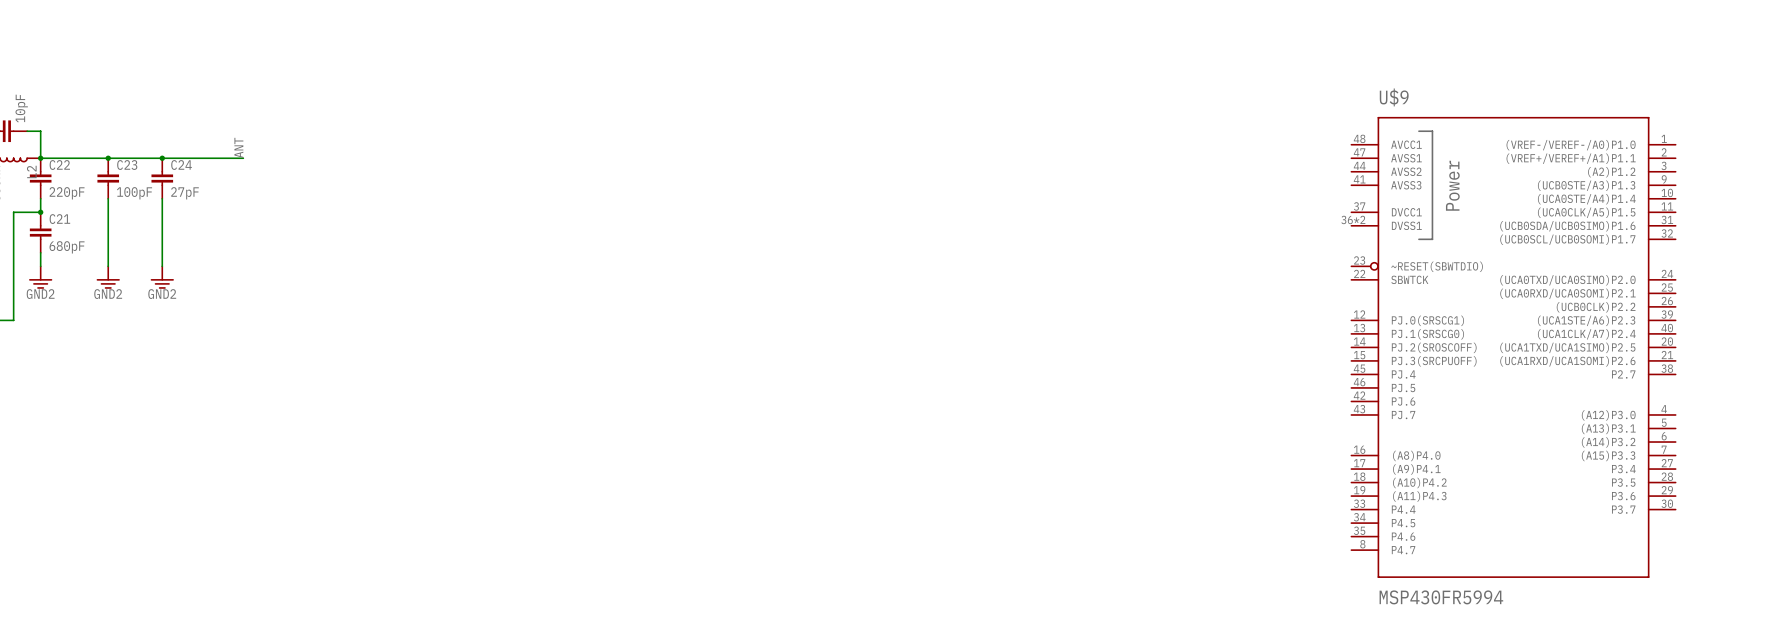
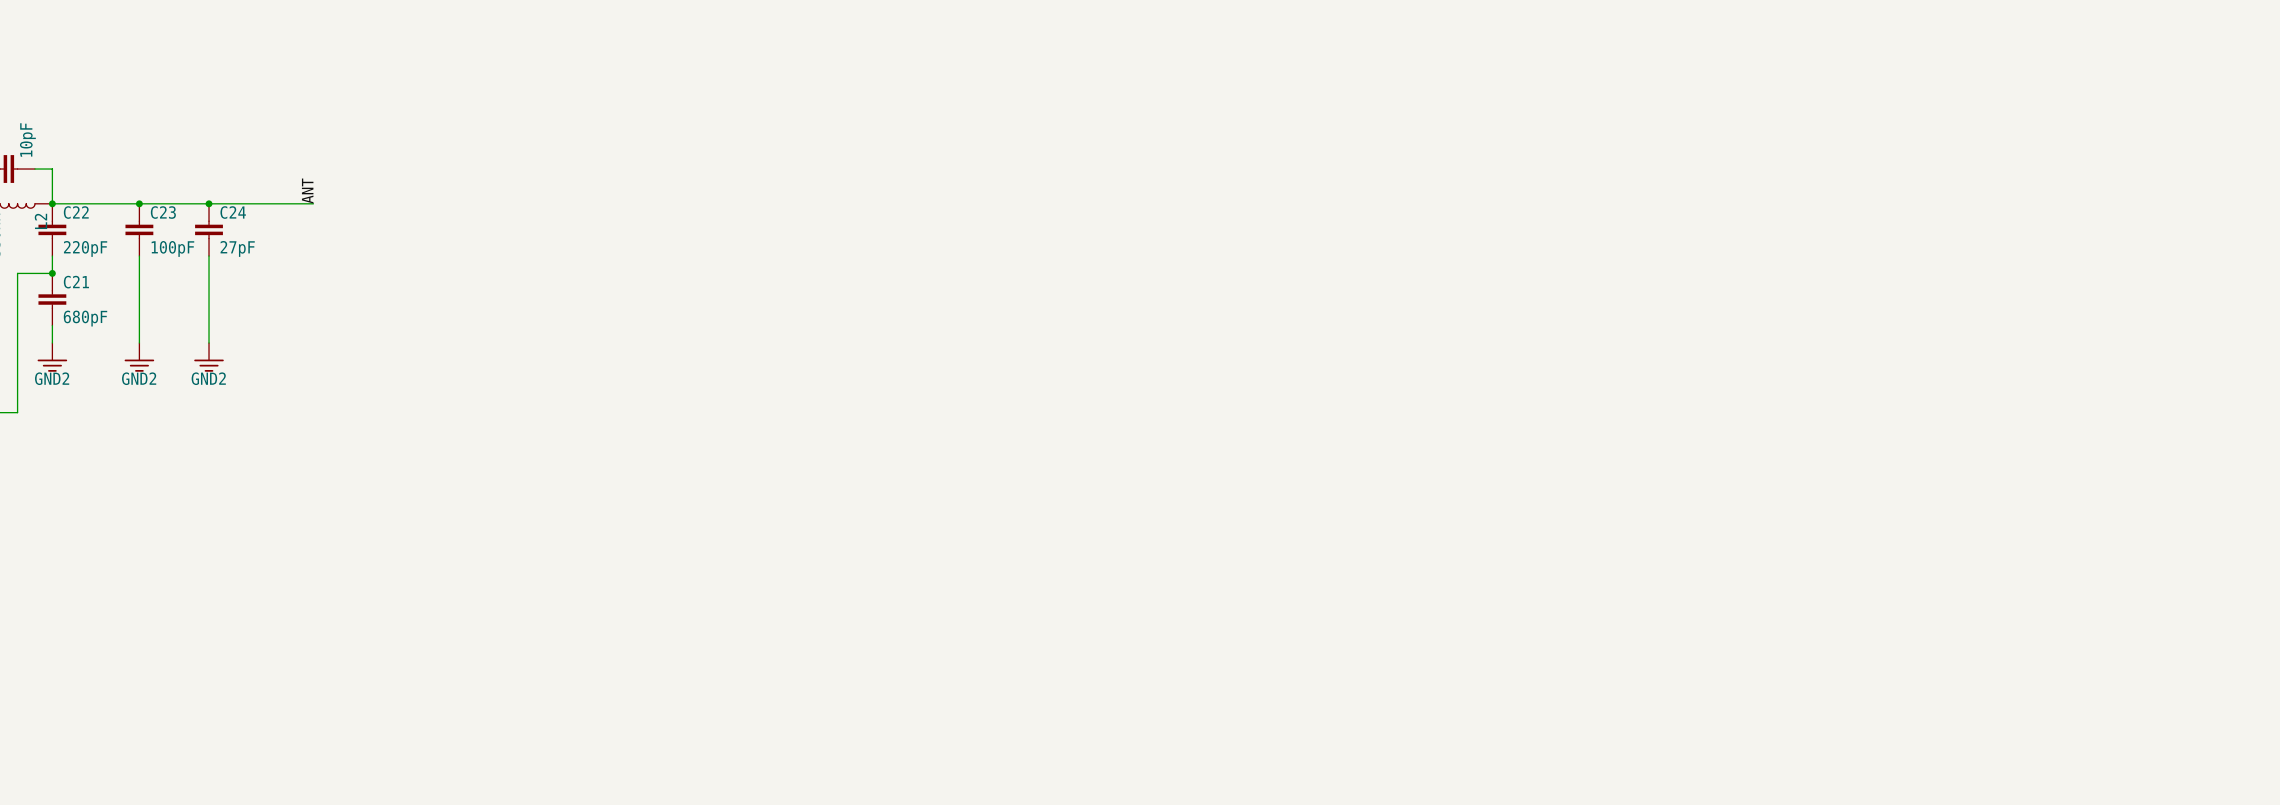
U$9: MSP430FR5994 (1513, 347) -> none

